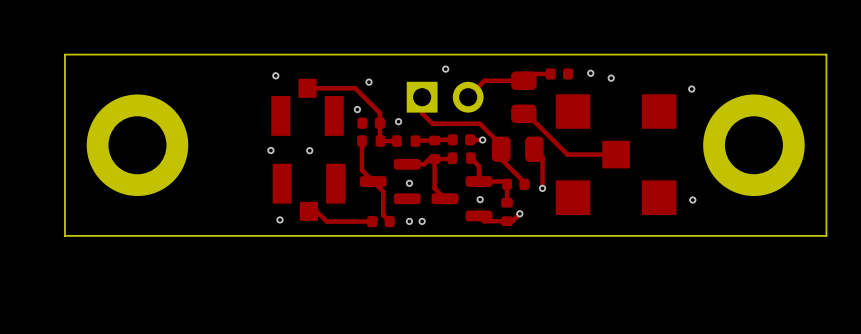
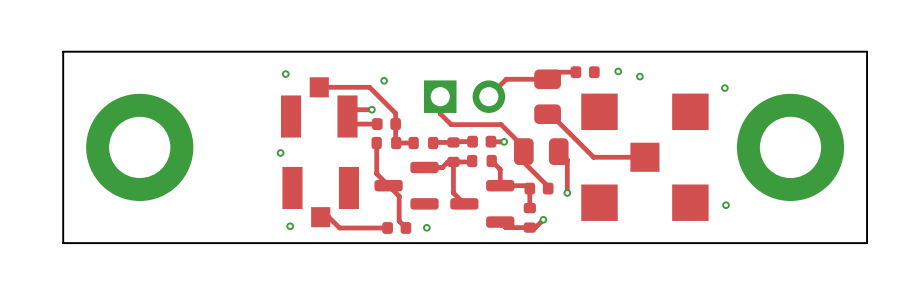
via: (445, 69) -> none
top track: none -> (371, 109) (354, 109)
via: (398, 121) -> none
top track: none -> (377, 124) (355, 124)
via: (309, 150) -> none
via: (409, 183) -> none
via: (480, 199) -> none
via: (422, 221) -> none

